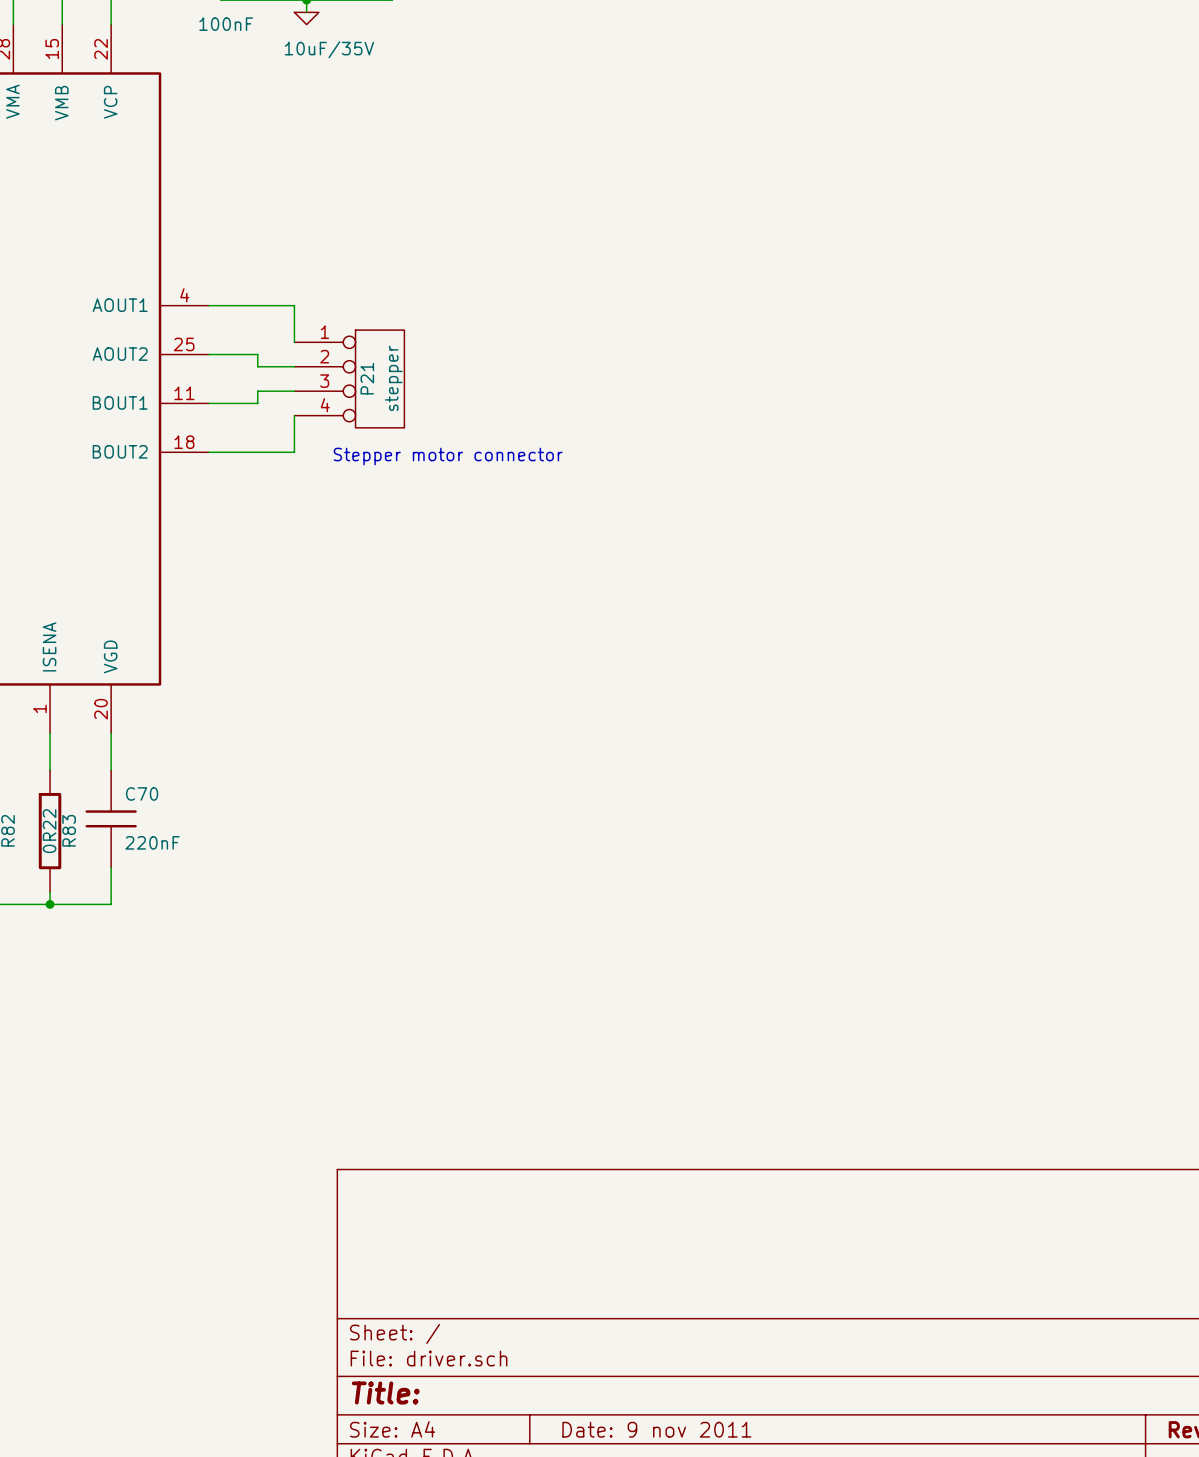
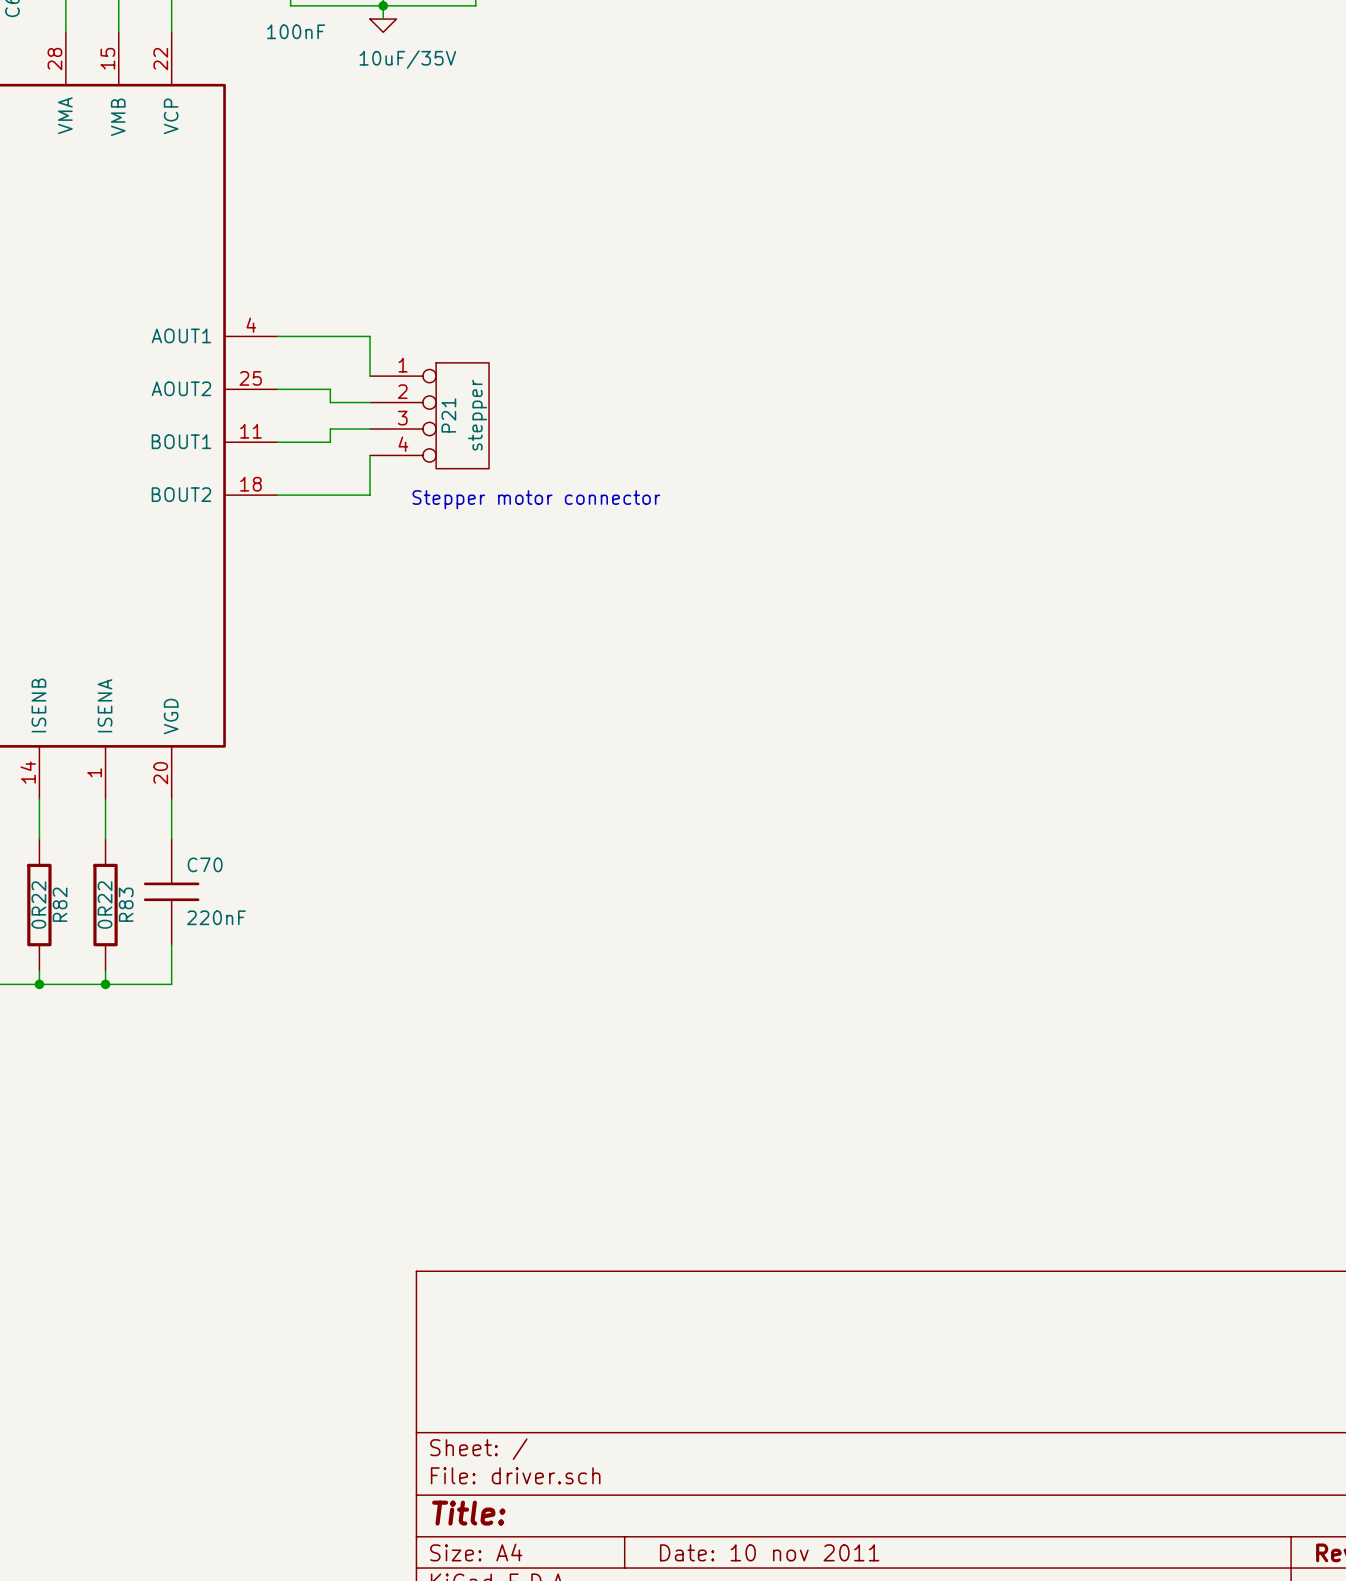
title block: Date: 9 nov 2011 (656, 1429) -> Date: 10 nov 2011 (769, 1552)

